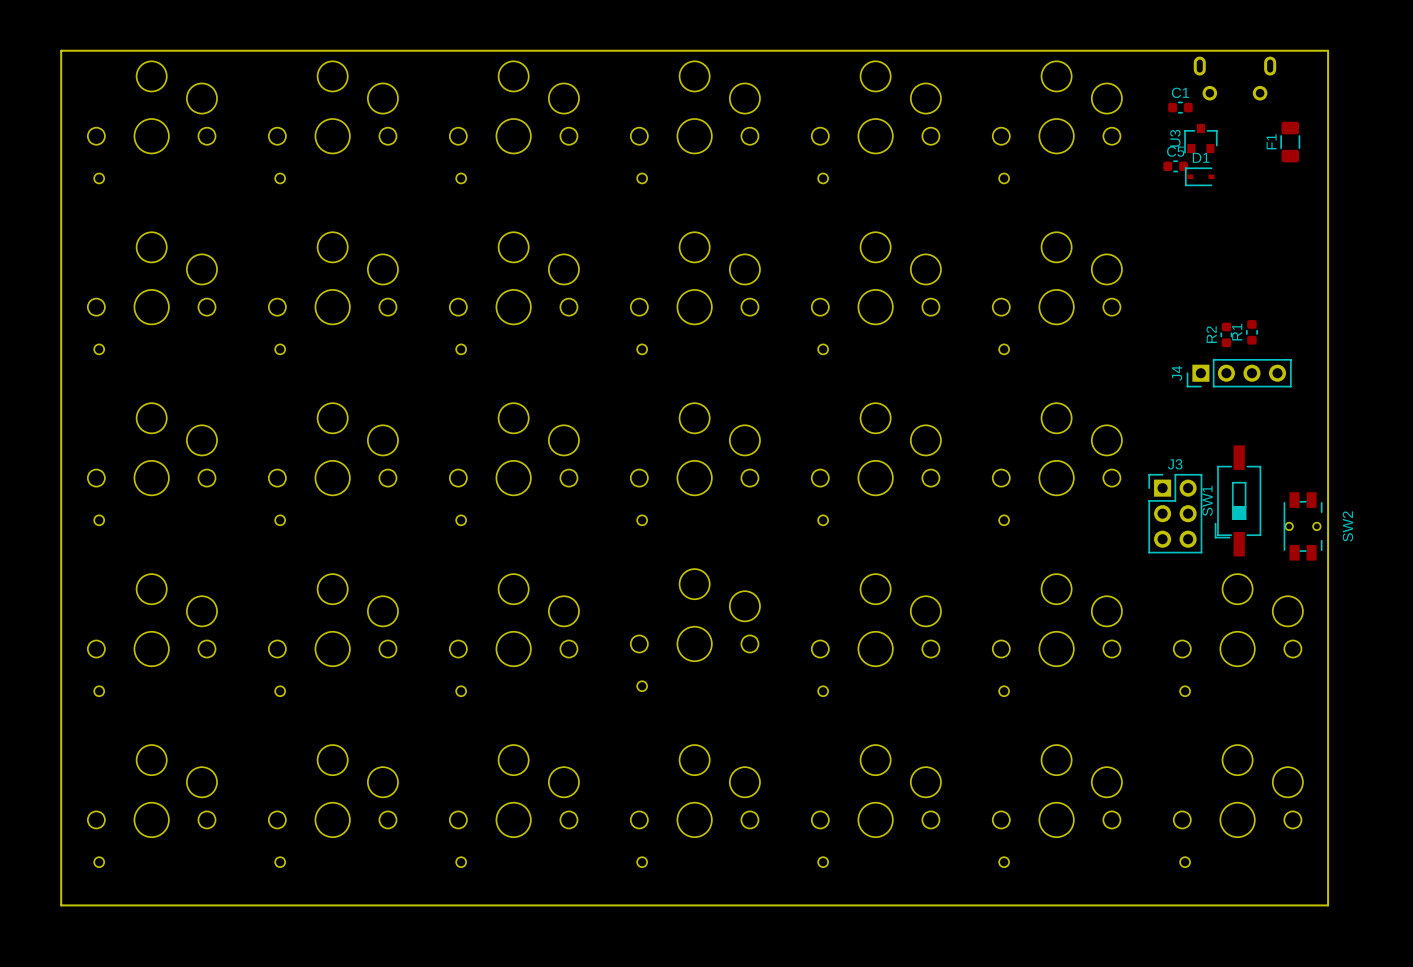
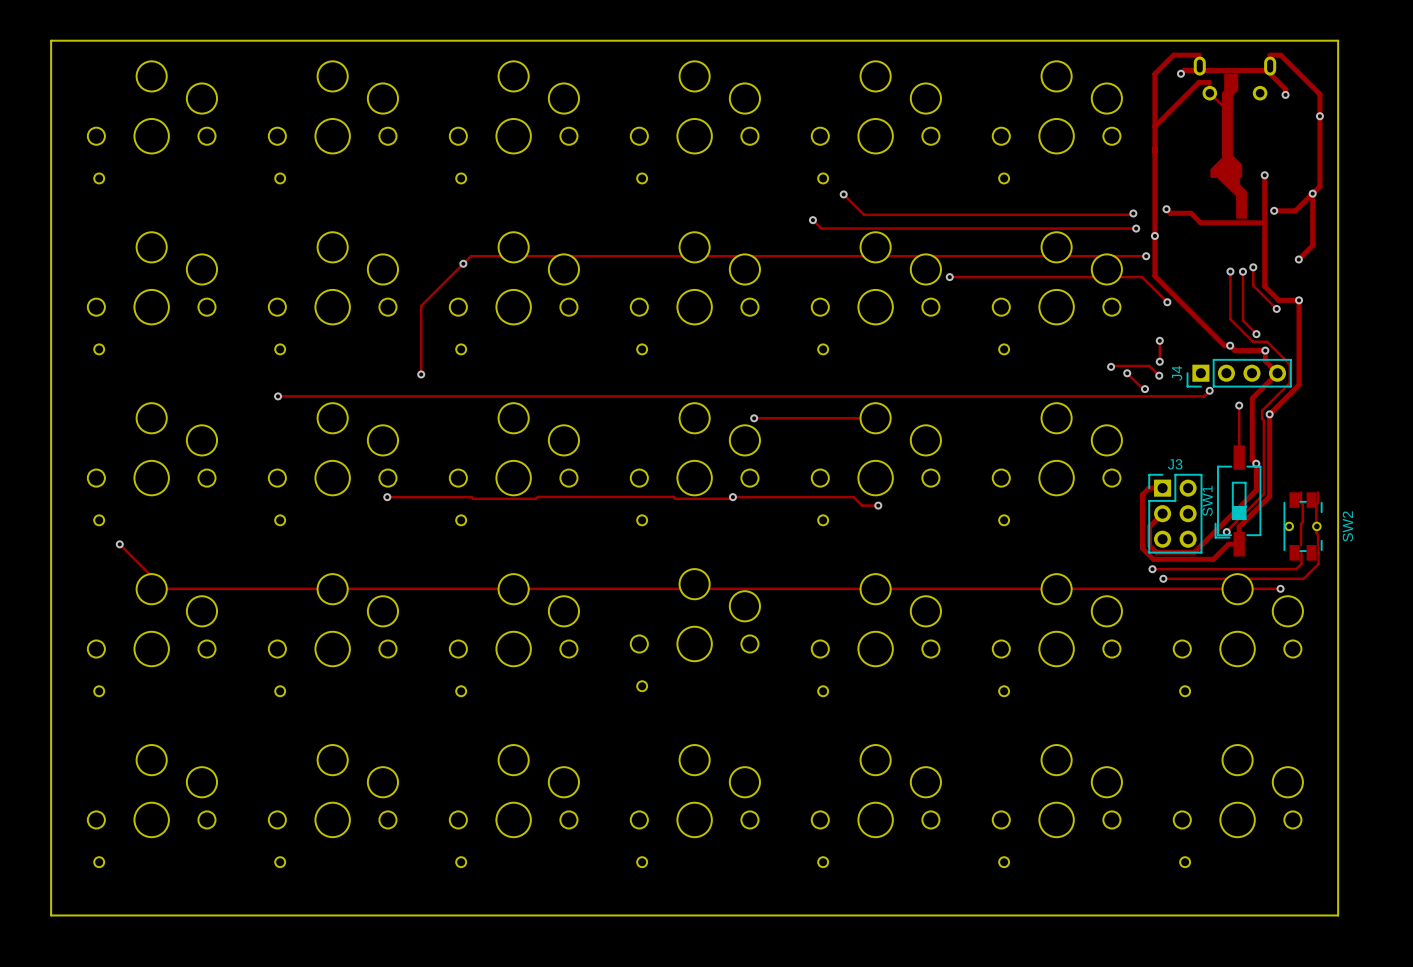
board edge: (61, 50) (61, 905) (1328, 905) (1328, 50) (61, 50) -> (51, 40) (51, 915) (1338, 915) (1338, 40) (51, 40)
track: none -> (1199, 55) (1173, 55) (1154, 73) (1154, 276) (1224, 345) (1230, 345) (1235, 350) (1265, 350) (1265, 361) (1277, 373) (1252, 398) (1252, 459) (1256, 463) (1256, 490) (1194, 552) (1156, 552) (1149, 545) (1149, 526) (1162, 513)
track: none -> (1269, 55) (1280, 55) (1319, 94) (1319, 186) (1295, 210) (1274, 210)
track: none -> (1180, 73) (1184, 70) (1266, 70) (1285, 89) (1285, 94)
via: none -> (1180, 73)
drawing: none -> [1210, 73, 1248, 219]
via: none -> (1285, 94)
C1: (1180, 107) -> none
track: none -> (1225, 109) (1209, 92) (1209, 82) (1199, 82) (1154, 126)
via: none -> (1319, 116)
U3: (1200, 138) -> none
F1: (1290, 142) -> none
C5: (1175, 166) -> none
track: none -> (1264, 175) (1264, 286) (1278, 300) (1299, 300) (1299, 384) (1269, 414) (1269, 496) (1239, 526) (1239, 544) (1228, 544) (1213, 559) (1153, 559) (1142, 548) (1142, 494) (1149, 488) (1162, 488)
via: none -> (1264, 175)
D1: (1199, 176) -> none
track: none -> (1312, 193) (1312, 245) (1298, 259)
via: none -> (1312, 193)
track: none -> (843, 194) (864, 214) (1133, 213)
via: none -> (843, 194)
track: none -> (1166, 209) (1170, 213) (1191, 213) (1200, 222) (1264, 222)
via: none -> (1166, 209)
via: none -> (1274, 210)
via: none -> (1133, 213)
track: none -> (812, 220) (821, 228) (1136, 228)
via: none -> (812, 220)
via: none -> (1136, 228)
via: none -> (1154, 235)
track: none -> (1146, 256) (470, 256) (421, 305) (421, 374)
via: none -> (1146, 256)
via: none -> (1298, 259)
via: none -> (463, 263)
track: none -> (1253, 267) (1253, 285) (1276, 308)
via: none -> (1253, 267)
track: none -> (1230, 271) (1230, 319) (1253, 341) (1267, 341) (1289, 364) (1289, 382) (1262, 410) (1263, 420) (1263, 494) (1226, 532)
via: none -> (1230, 271)
track: none -> (1242, 271) (1242, 320) (1256, 334)
via: none -> (1242, 271)
track: none -> (949, 277) (1142, 277) (1167, 302)
via: none -> (949, 277)
via: none -> (1299, 300)
via: none -> (1167, 302)
via: none -> (1276, 308)
R1: (1251, 332) -> none
R2: (1226, 334) -> none
via: none -> (1256, 334)
track: none -> (1159, 340) (1159, 361)
via: none -> (1159, 340)
via: none -> (1230, 345)
via: none -> (1265, 350)
via: none -> (1159, 361)
track: none -> (1111, 366) (1149, 366) (1159, 375)
via: none -> (1111, 366)
track: none -> (1127, 373) (1144, 389)
via: none -> (1127, 373)
via: none -> (421, 374)
via: none -> (1159, 375)
via: none -> (1144, 389)
track: none -> (1209, 390) (1204, 396) (278, 396)
via: none -> (1209, 390)
via: none -> (278, 396)
track: none -> (1239, 405) (1239, 457)
via: none -> (1239, 405)
via: none -> (1269, 414)
track: none -> (754, 418) (863, 418)
via: none -> (754, 418)
via: none -> (1256, 463)
track: none -> (1301, 492) (1302, 504) (1301, 545)
track: none -> (1318, 492) (1316, 504) (1318, 545)
track: none -> (387, 497) (535, 498) (537, 496) (673, 496) (675, 498) (731, 498) (732, 497) (853, 497) (862, 505) (878, 505)
via: none -> (387, 497)
via: none -> (732, 497)
via: none -> (878, 505)
via: none -> (1226, 532)
track: none -> (119, 544) (164, 588) (1280, 588)
via: none -> (119, 544)
track: none -> (1318, 547) (1318, 564) (1303, 578) (1163, 578)
track: none -> (1301, 552) (1301, 564) (1296, 569) (1152, 569)
via: none -> (1152, 569)
via: none -> (1163, 578)
via: none -> (1280, 588)

